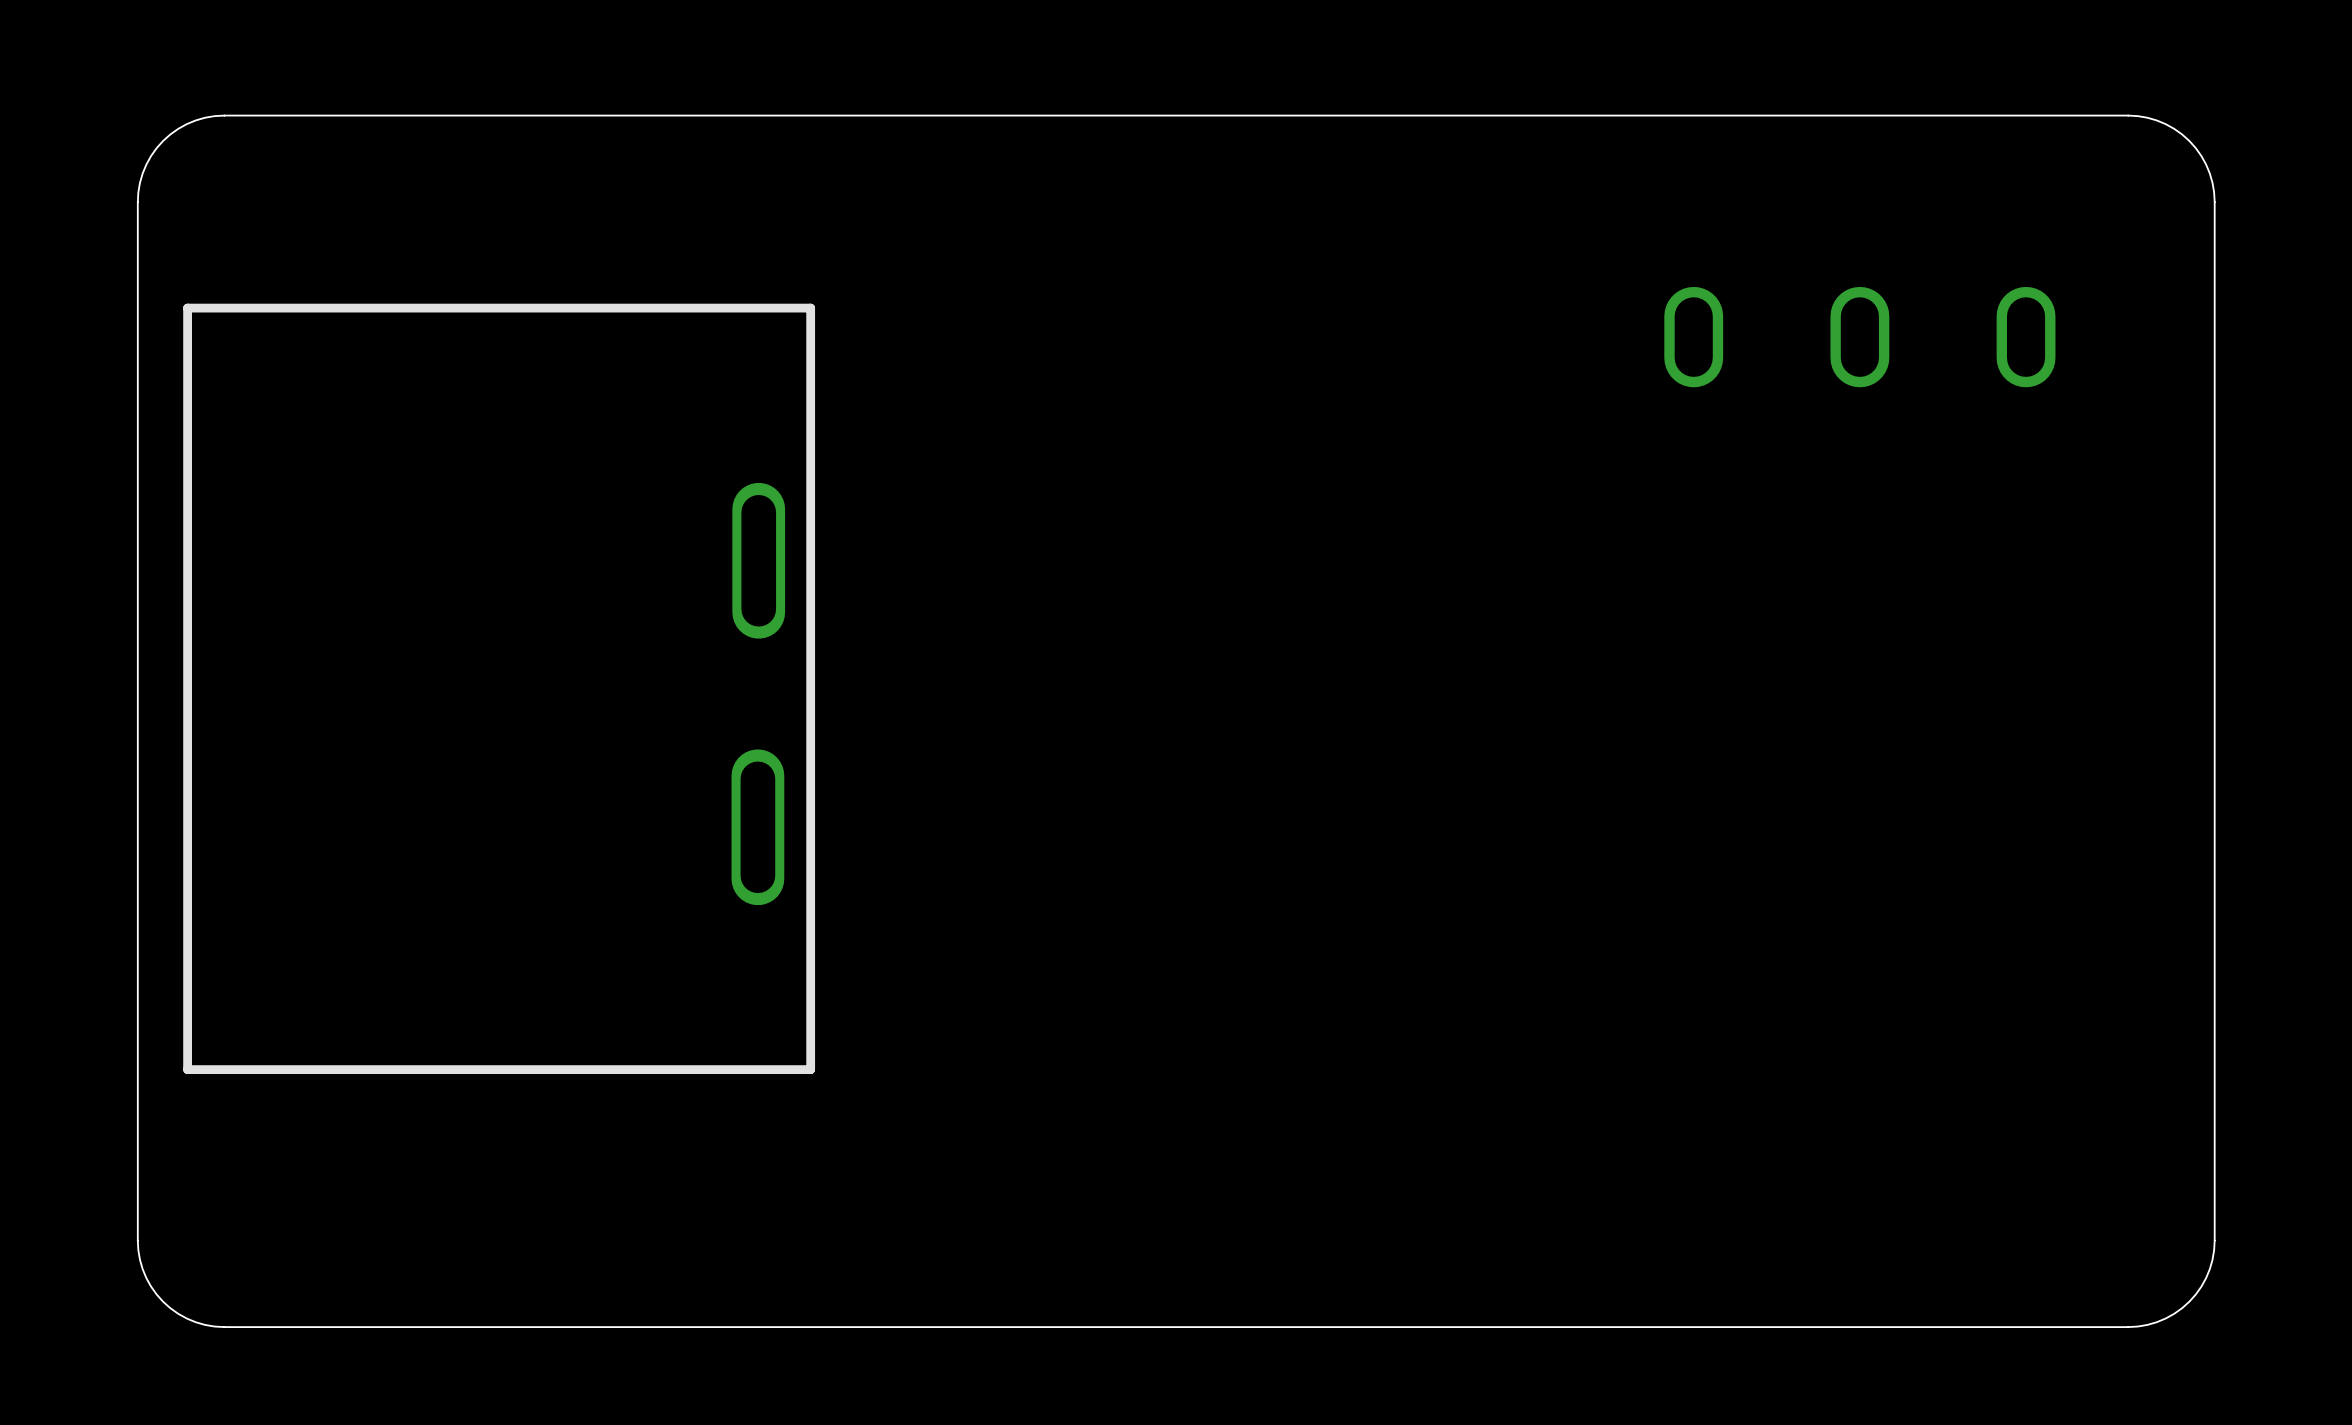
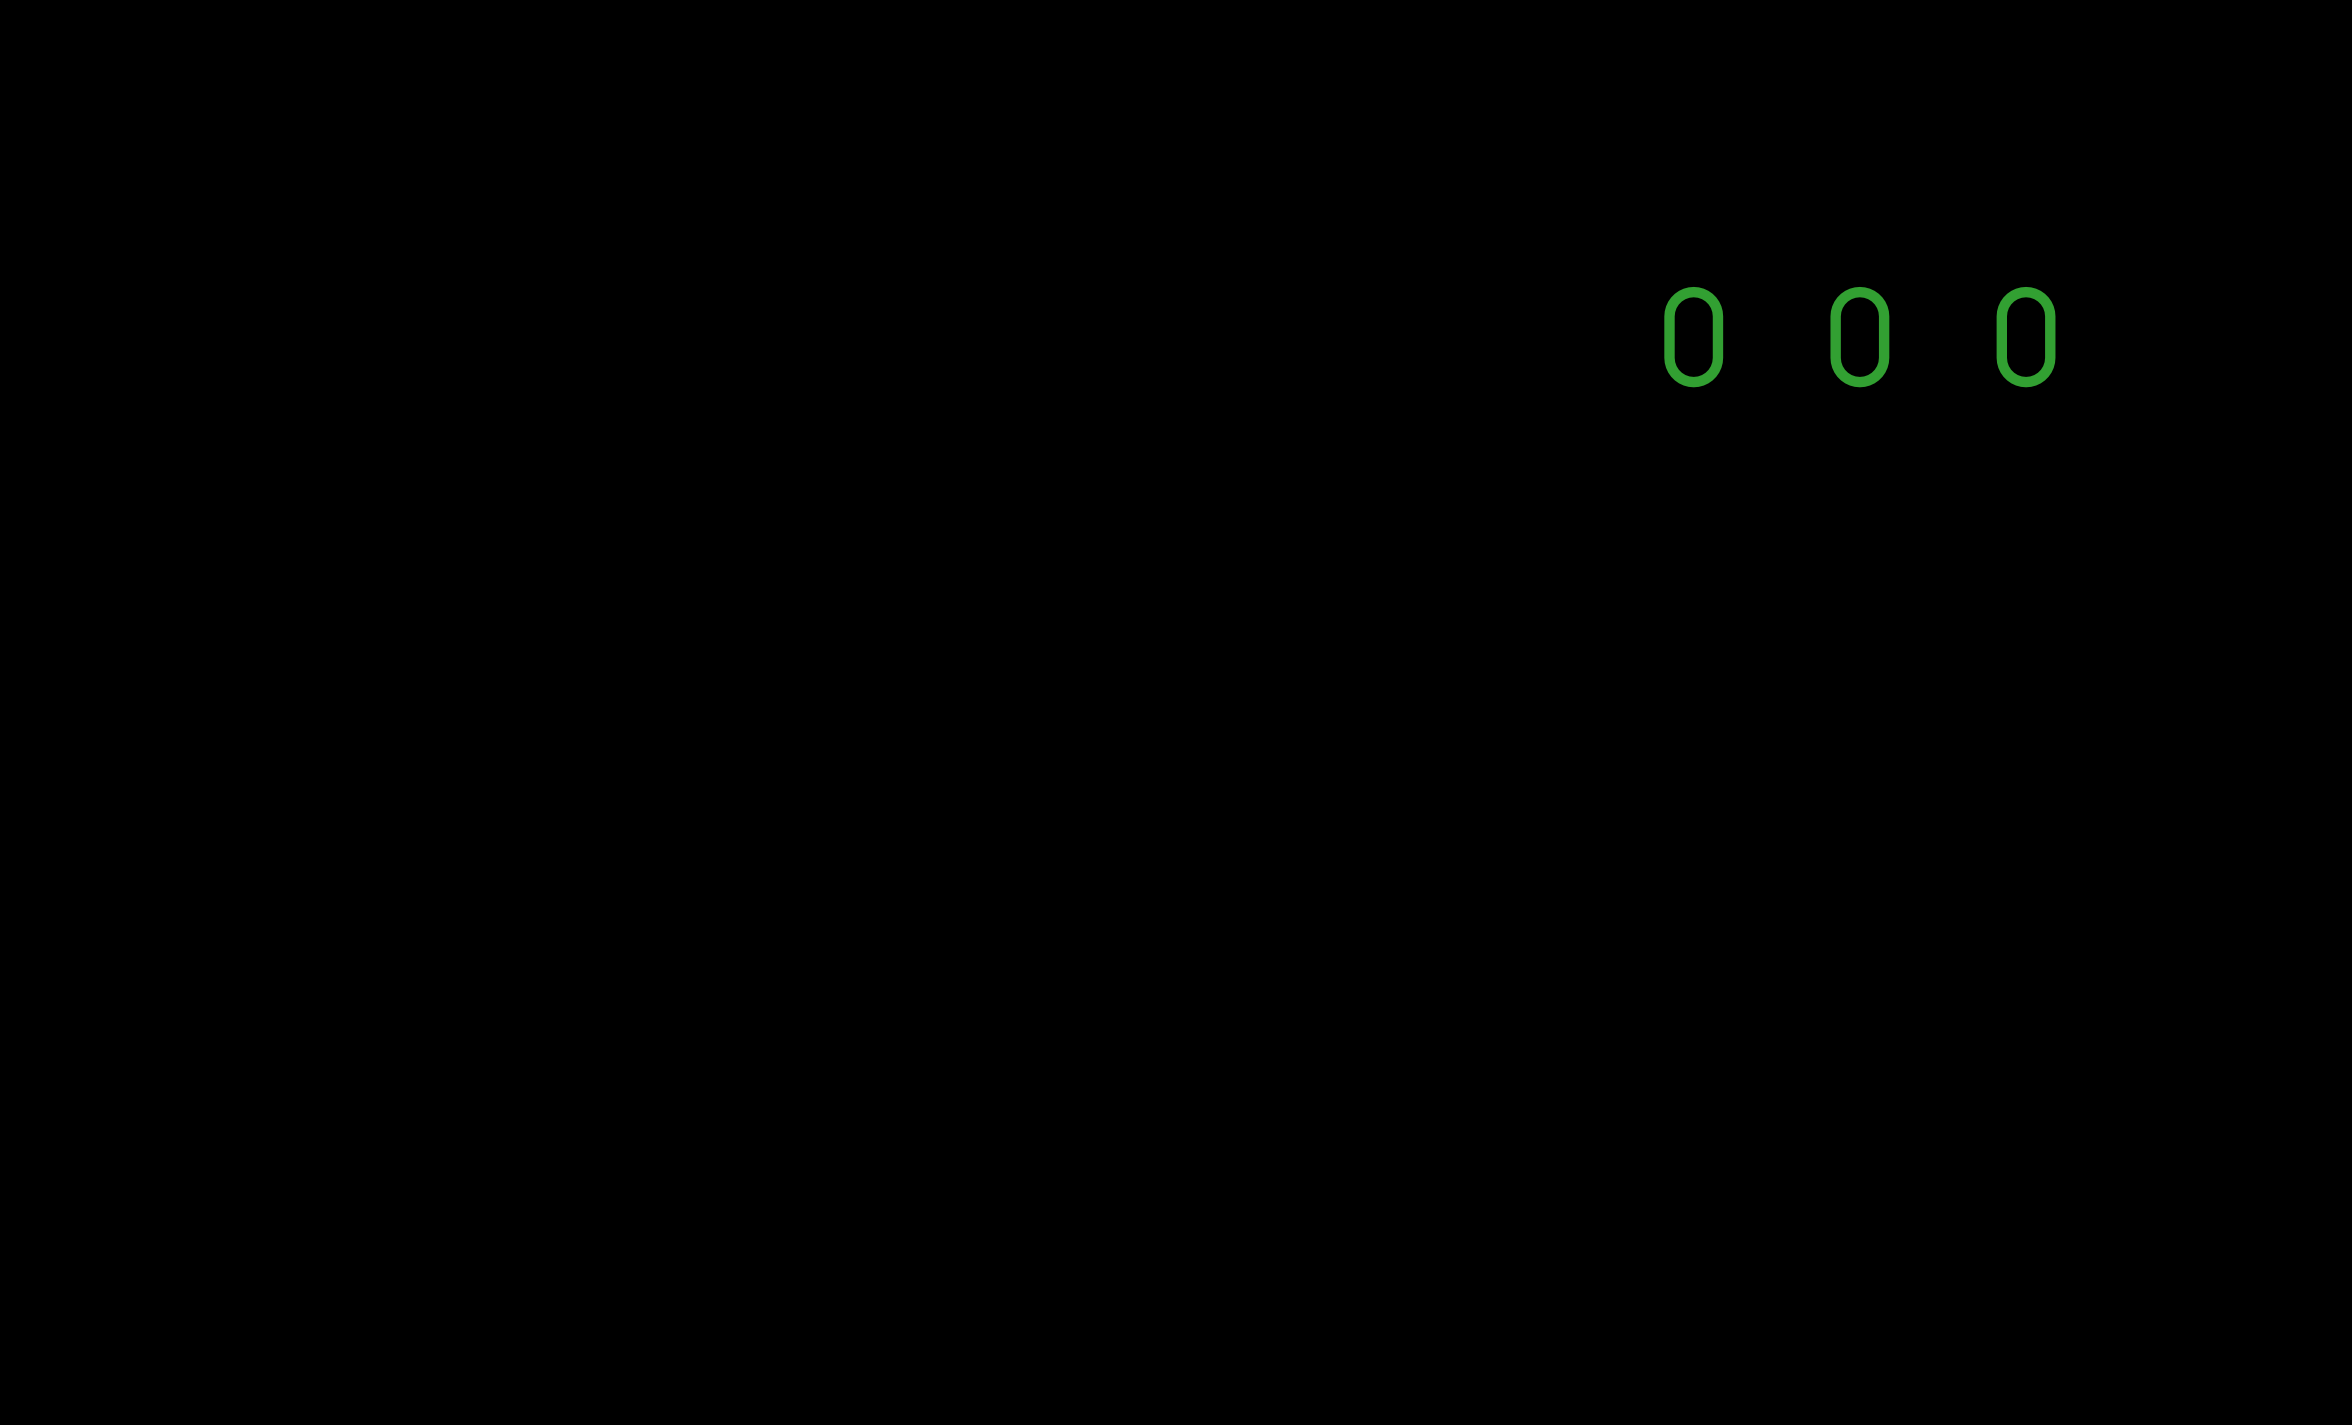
board edge: (2128, 115) (224, 115) (195, 120) (178, 128) (163, 140) (151, 156) (142, 173) (137, 202) (137, 1240) (139, 1259) (151, 1286) (170, 1308) (186, 1318) (205, 1324) (224, 1327) (2128, 1327) (2147, 1324) (2174, 1313) (2189, 1301) (2201, 1286) (2209, 1269) (2214, 1240) (2214, 202) (2209, 173) (2201, 156) (2189, 140) (2165, 124) (2147, 117) (2128, 115) -> none
part: (499, 688) -> none

